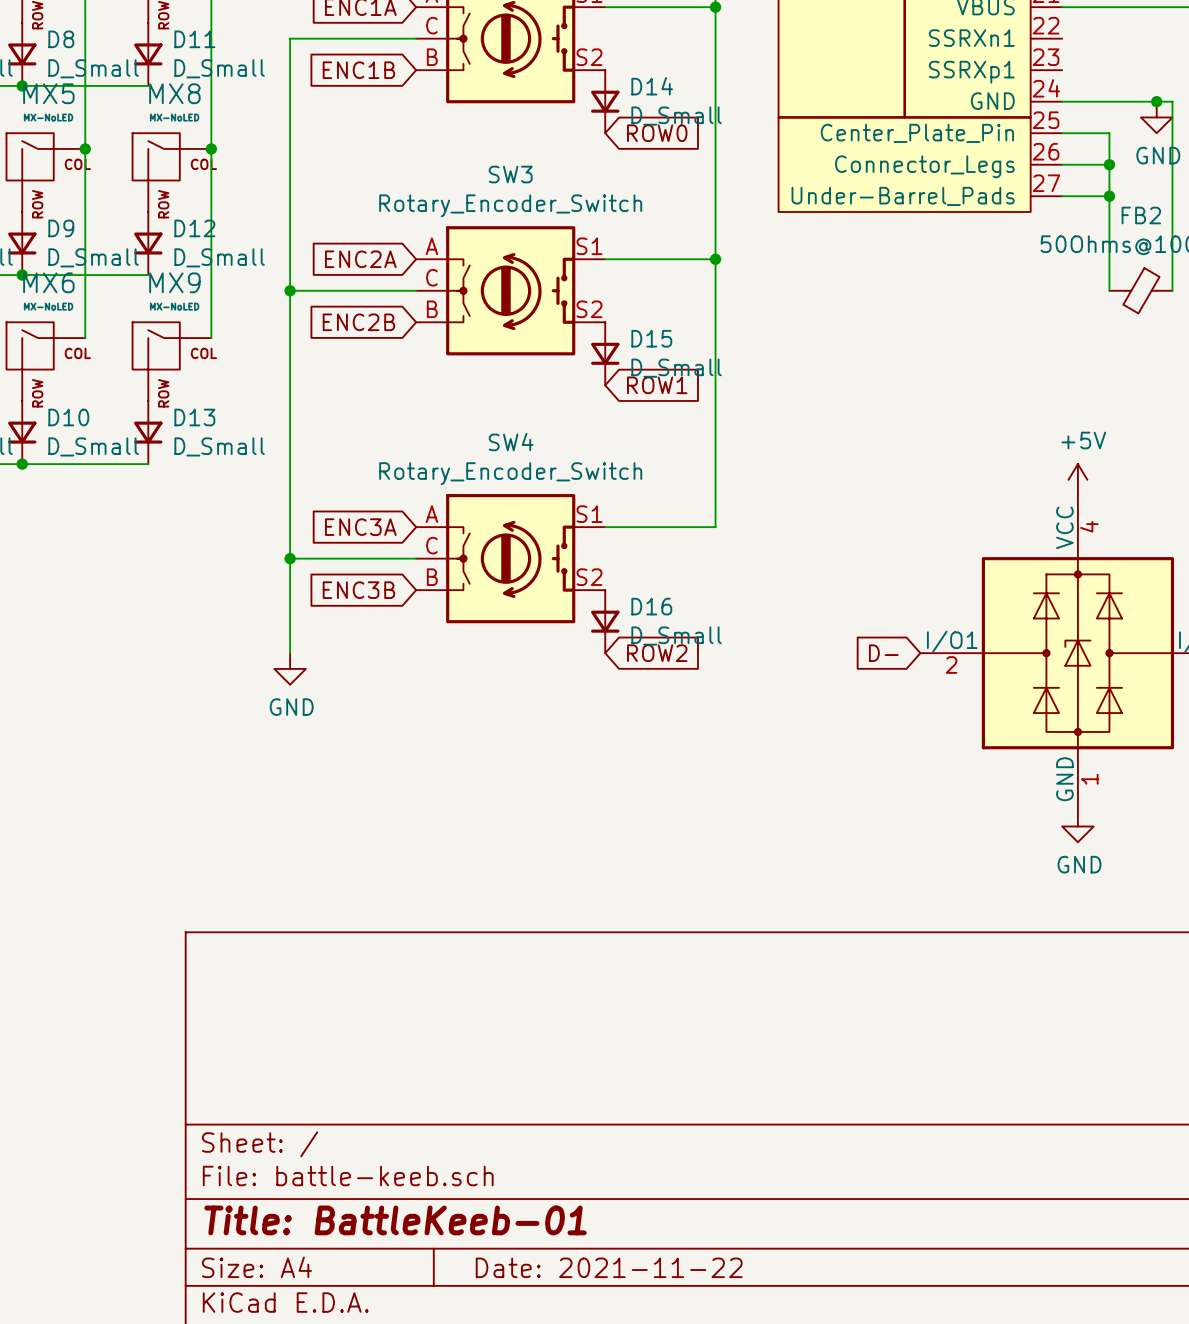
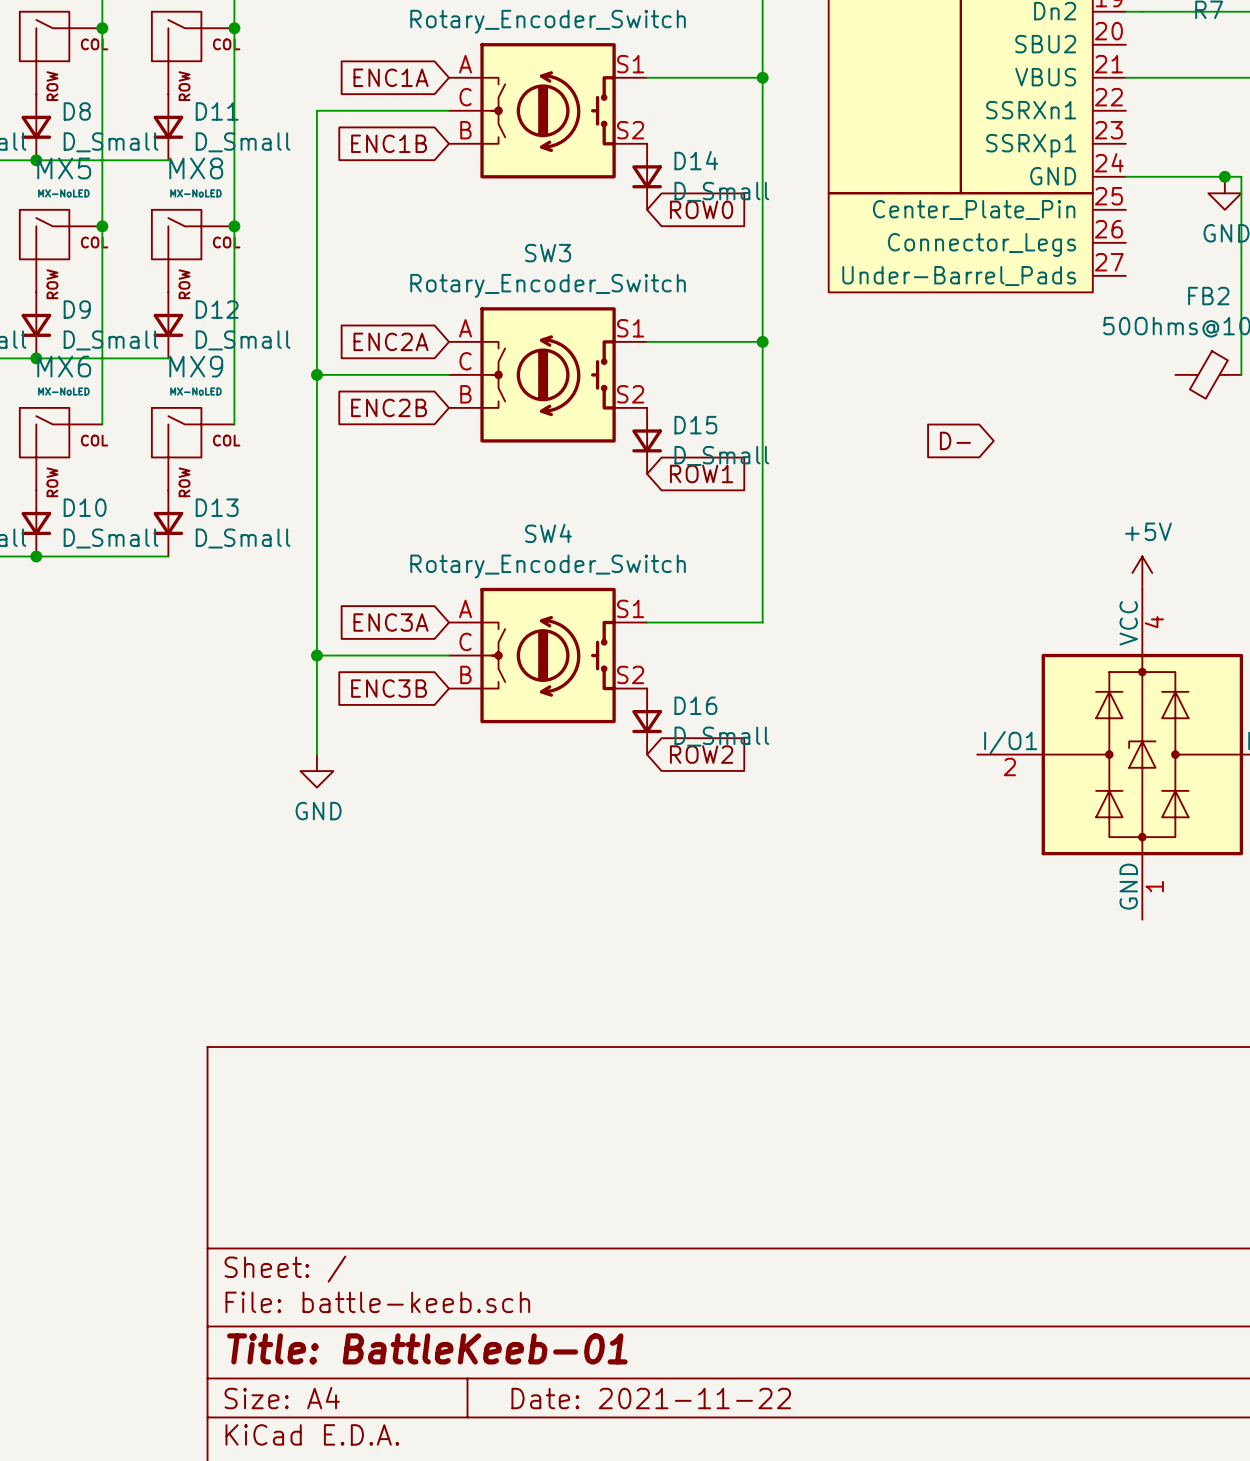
wire: (1062, 133) (1109, 133) (1109, 290) -> none
wire: (1062, 164) (1109, 164) -> none
junction: (1109, 164) -> none
wire: (1062, 196) (1109, 196) -> none
junction: (1109, 196) -> none
global label position: D- (883, 653) -> D- (955, 440)
power symbol: GND (1077, 826) -> none

